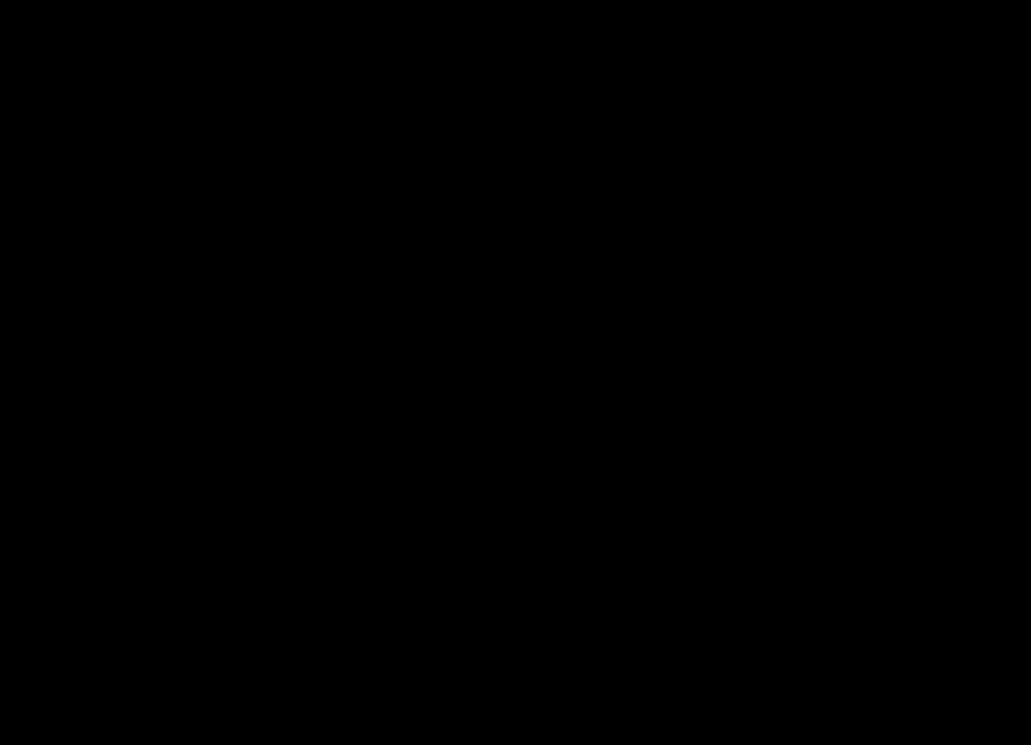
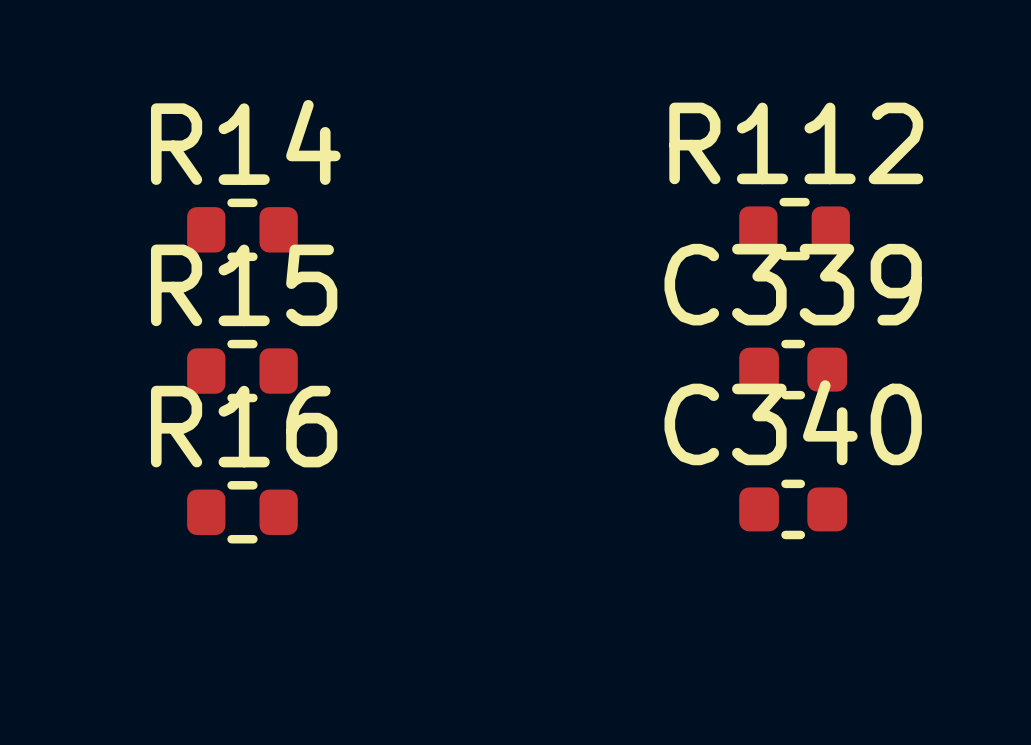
R14: none -> (242, 229)
R112: none -> (794, 229)
C339: none -> (793, 369)
R15: none -> (242, 371)
C340: none -> (793, 509)
R16: none -> (242, 512)

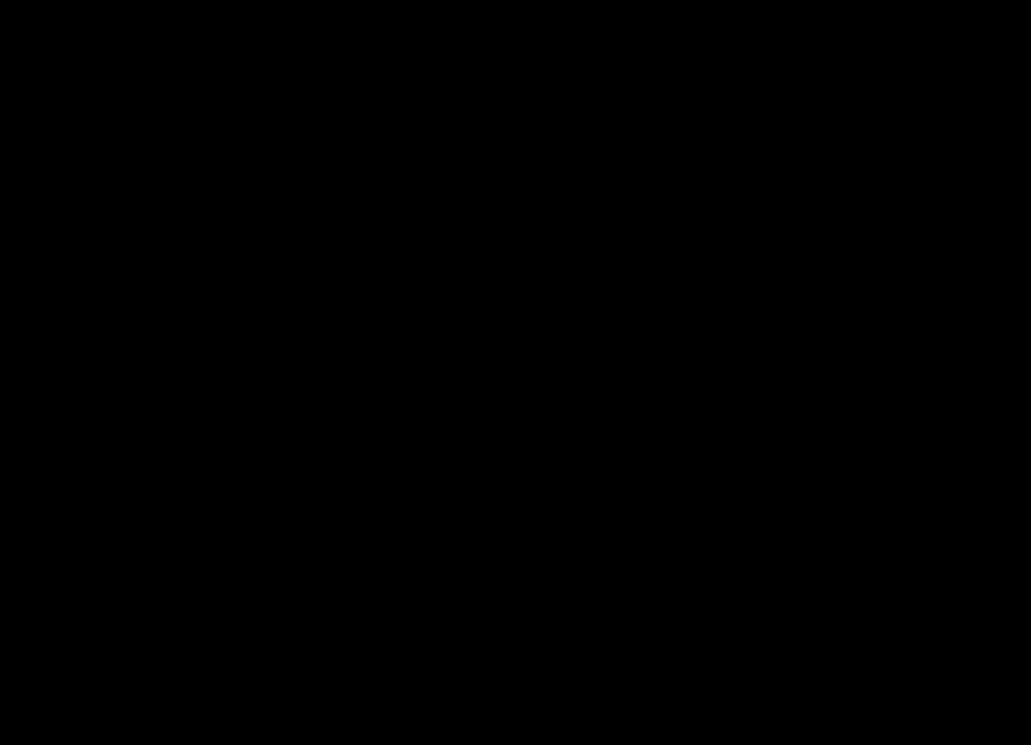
R14: (242, 229) -> none
R112: (794, 229) -> none
C339: (793, 369) -> none
R15: (242, 371) -> none
C340: (793, 509) -> none
R16: (242, 512) -> none

